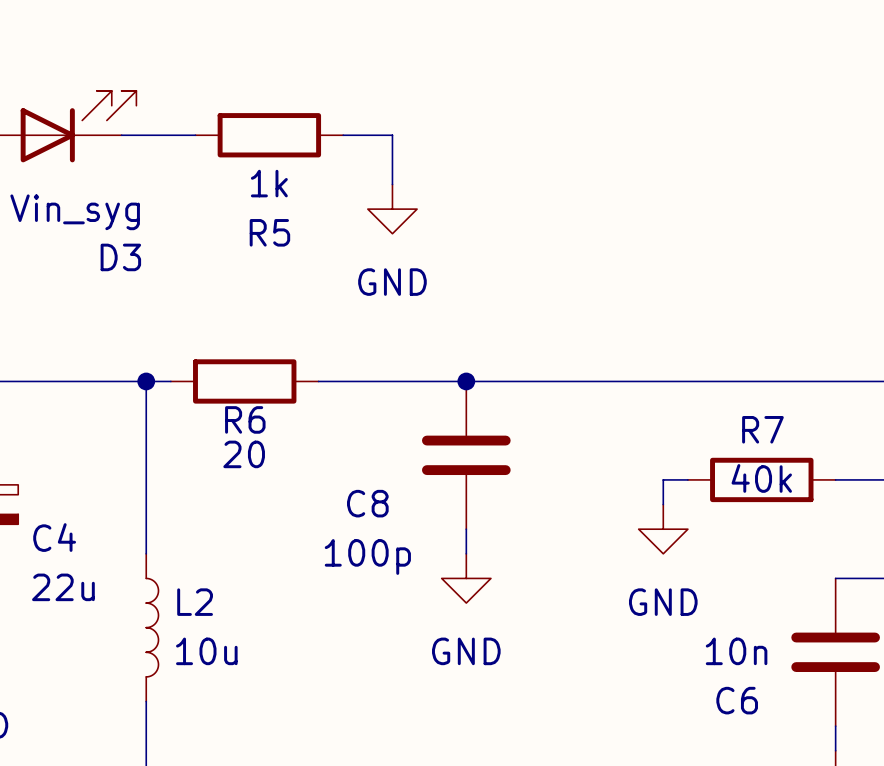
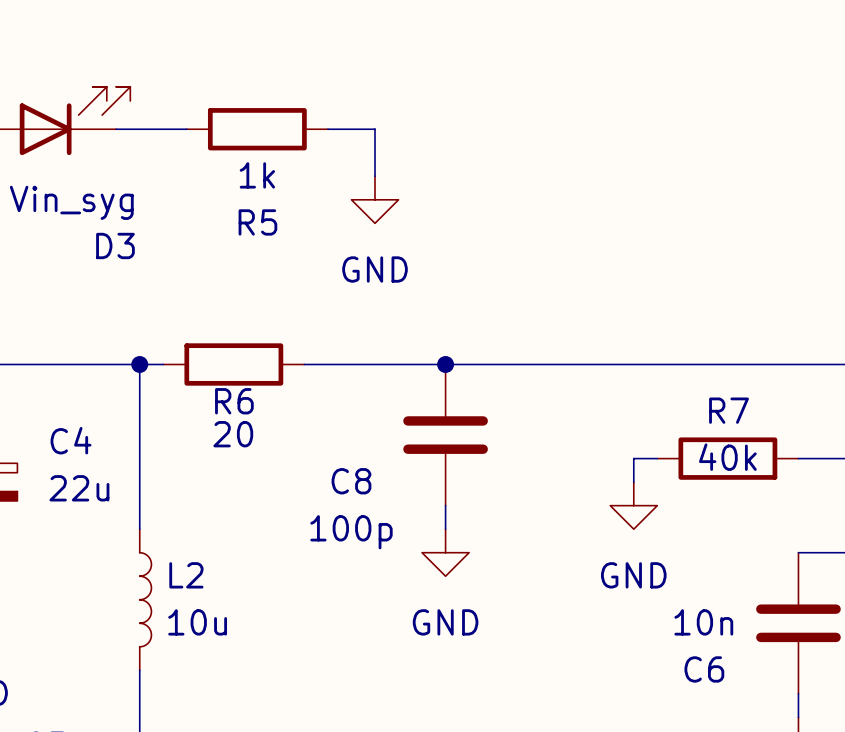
C4 name position: C4 (54, 537) -> C4 (71, 440)
C4 value position: 22u (63, 587) -> 22u (79, 488)

